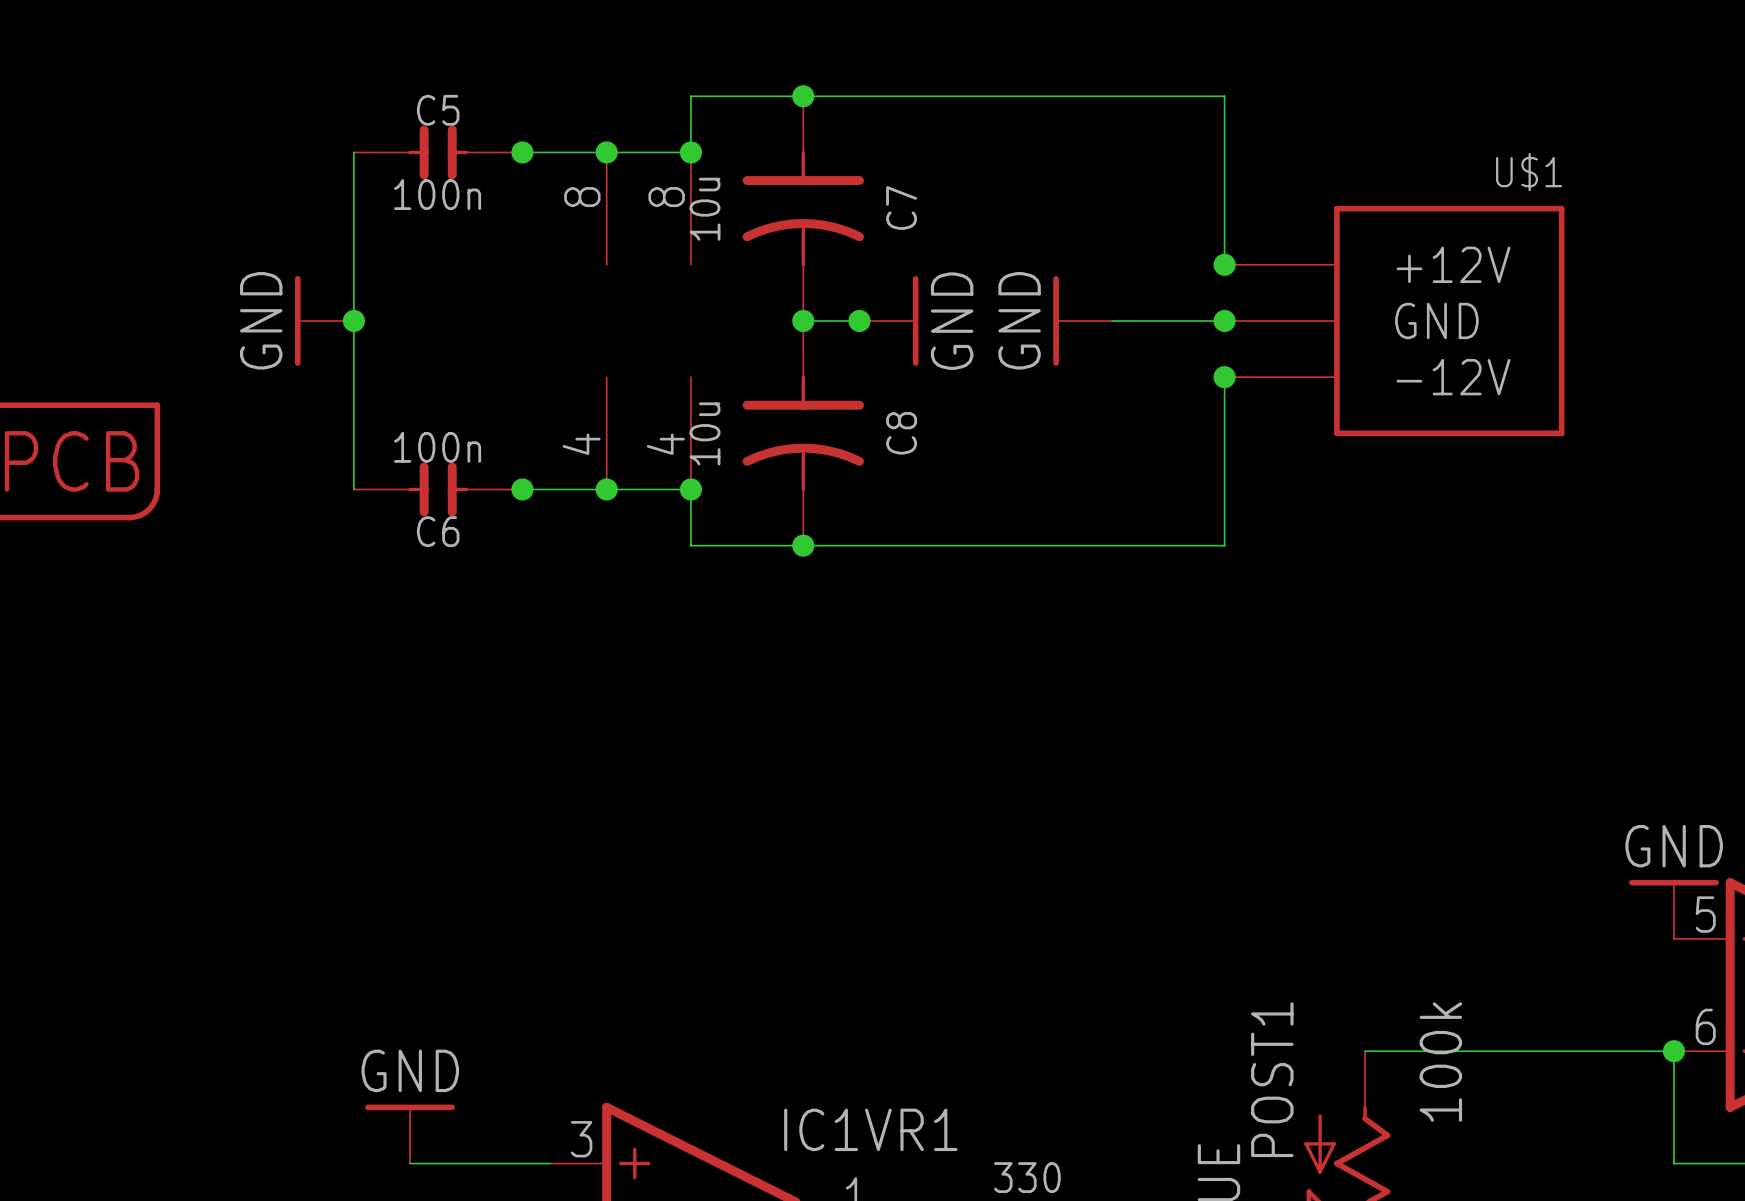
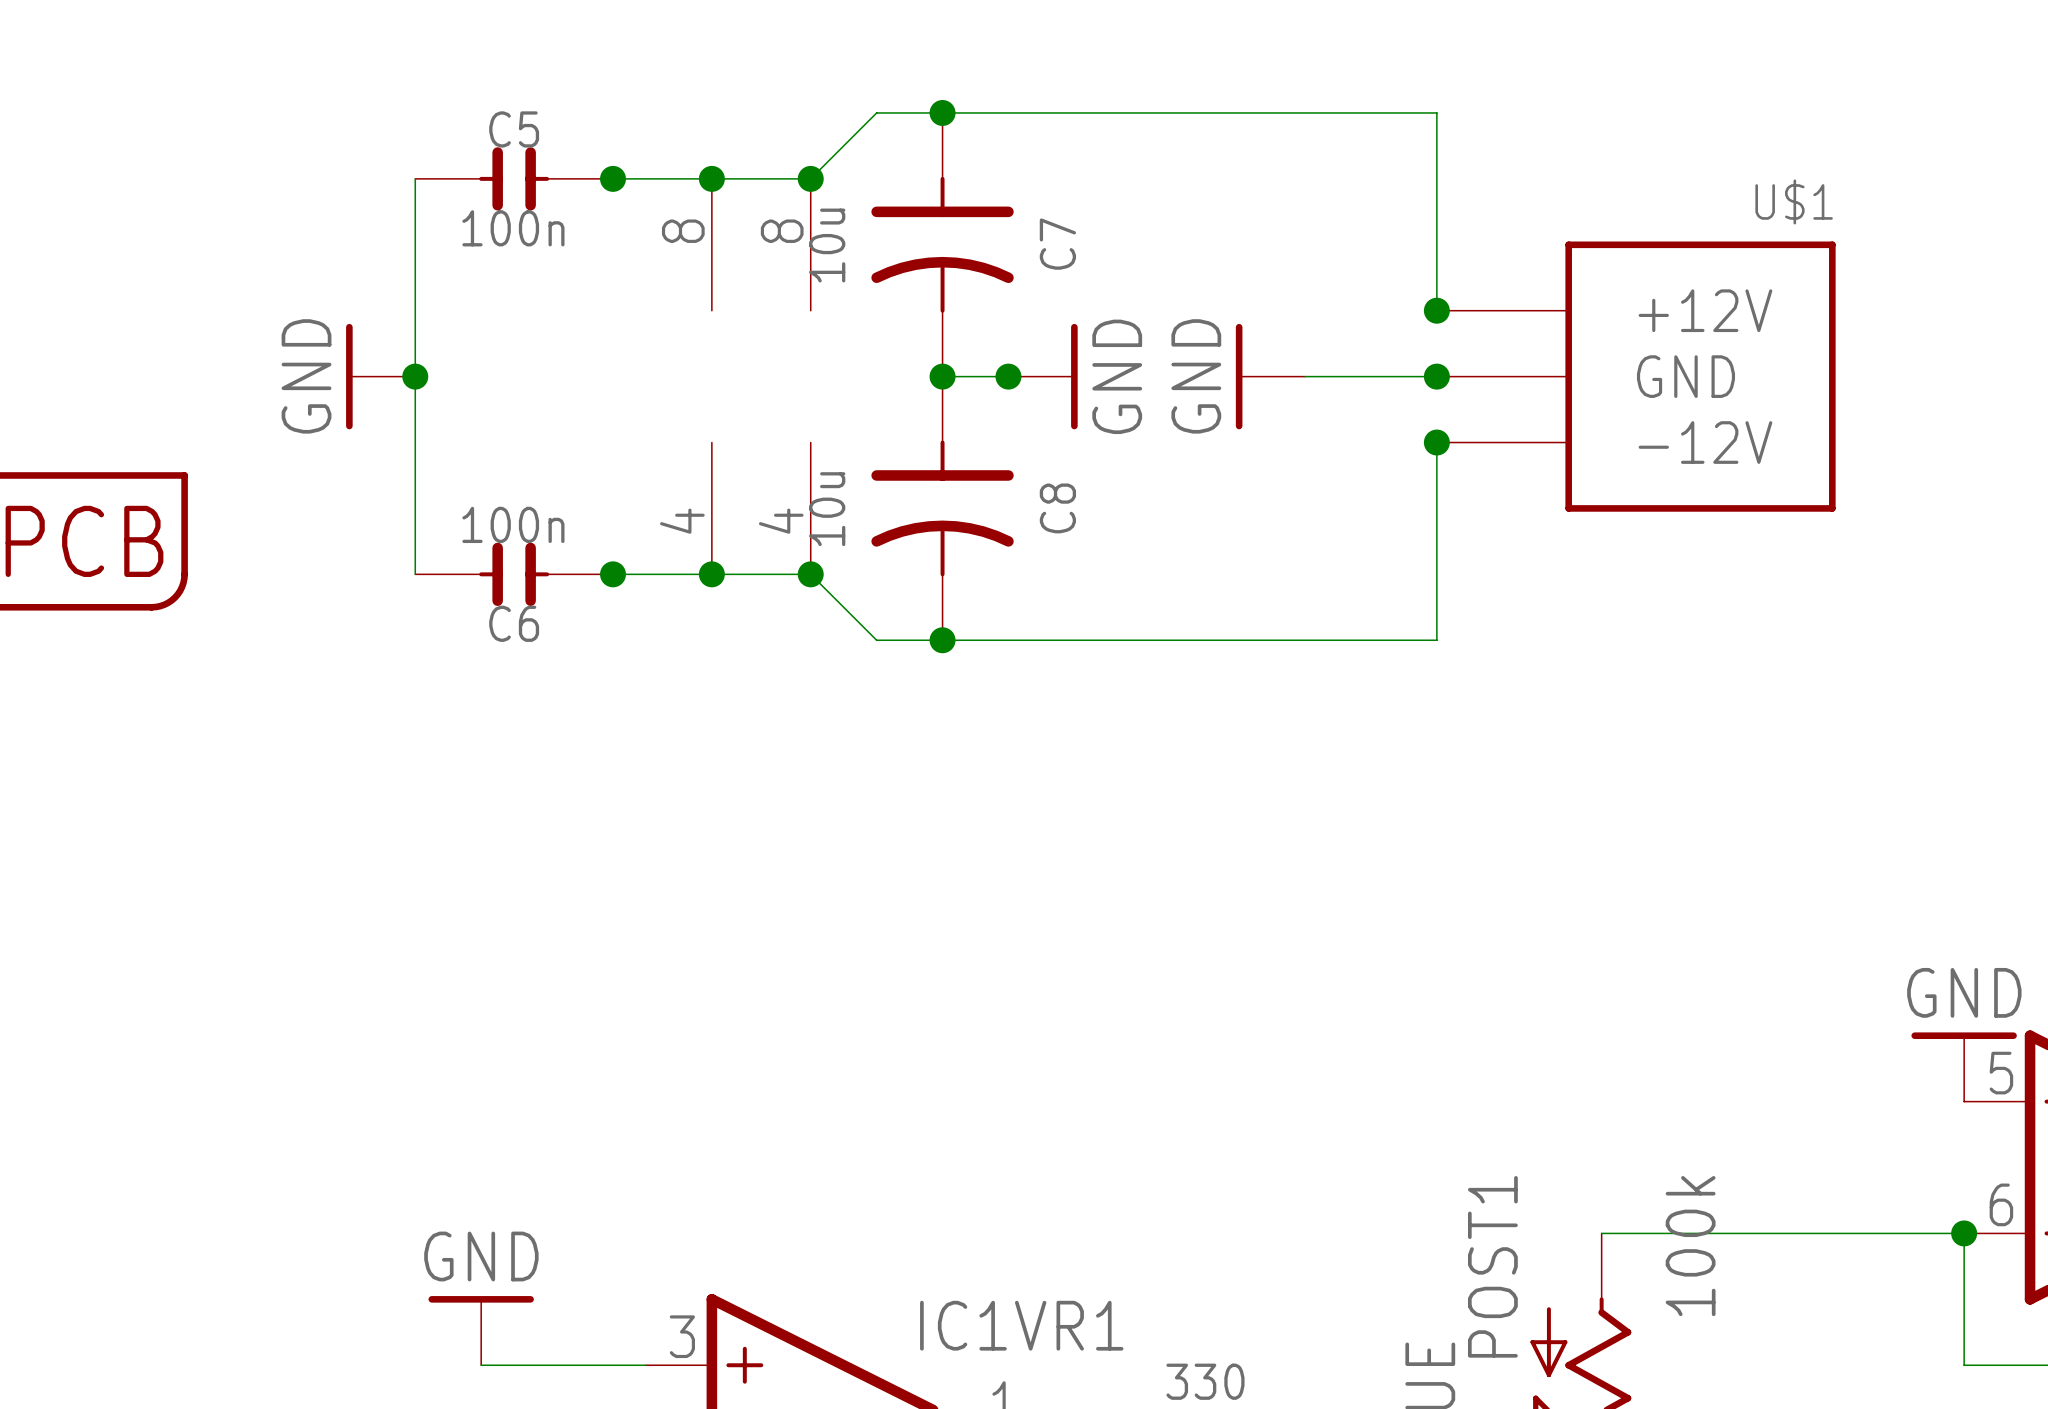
wire: (747, 96) (690, 96) (690, 152) -> (876, 112) (810, 178)
wire: (690, 489) (690, 545) (747, 545) -> (810, 574) (876, 640)

